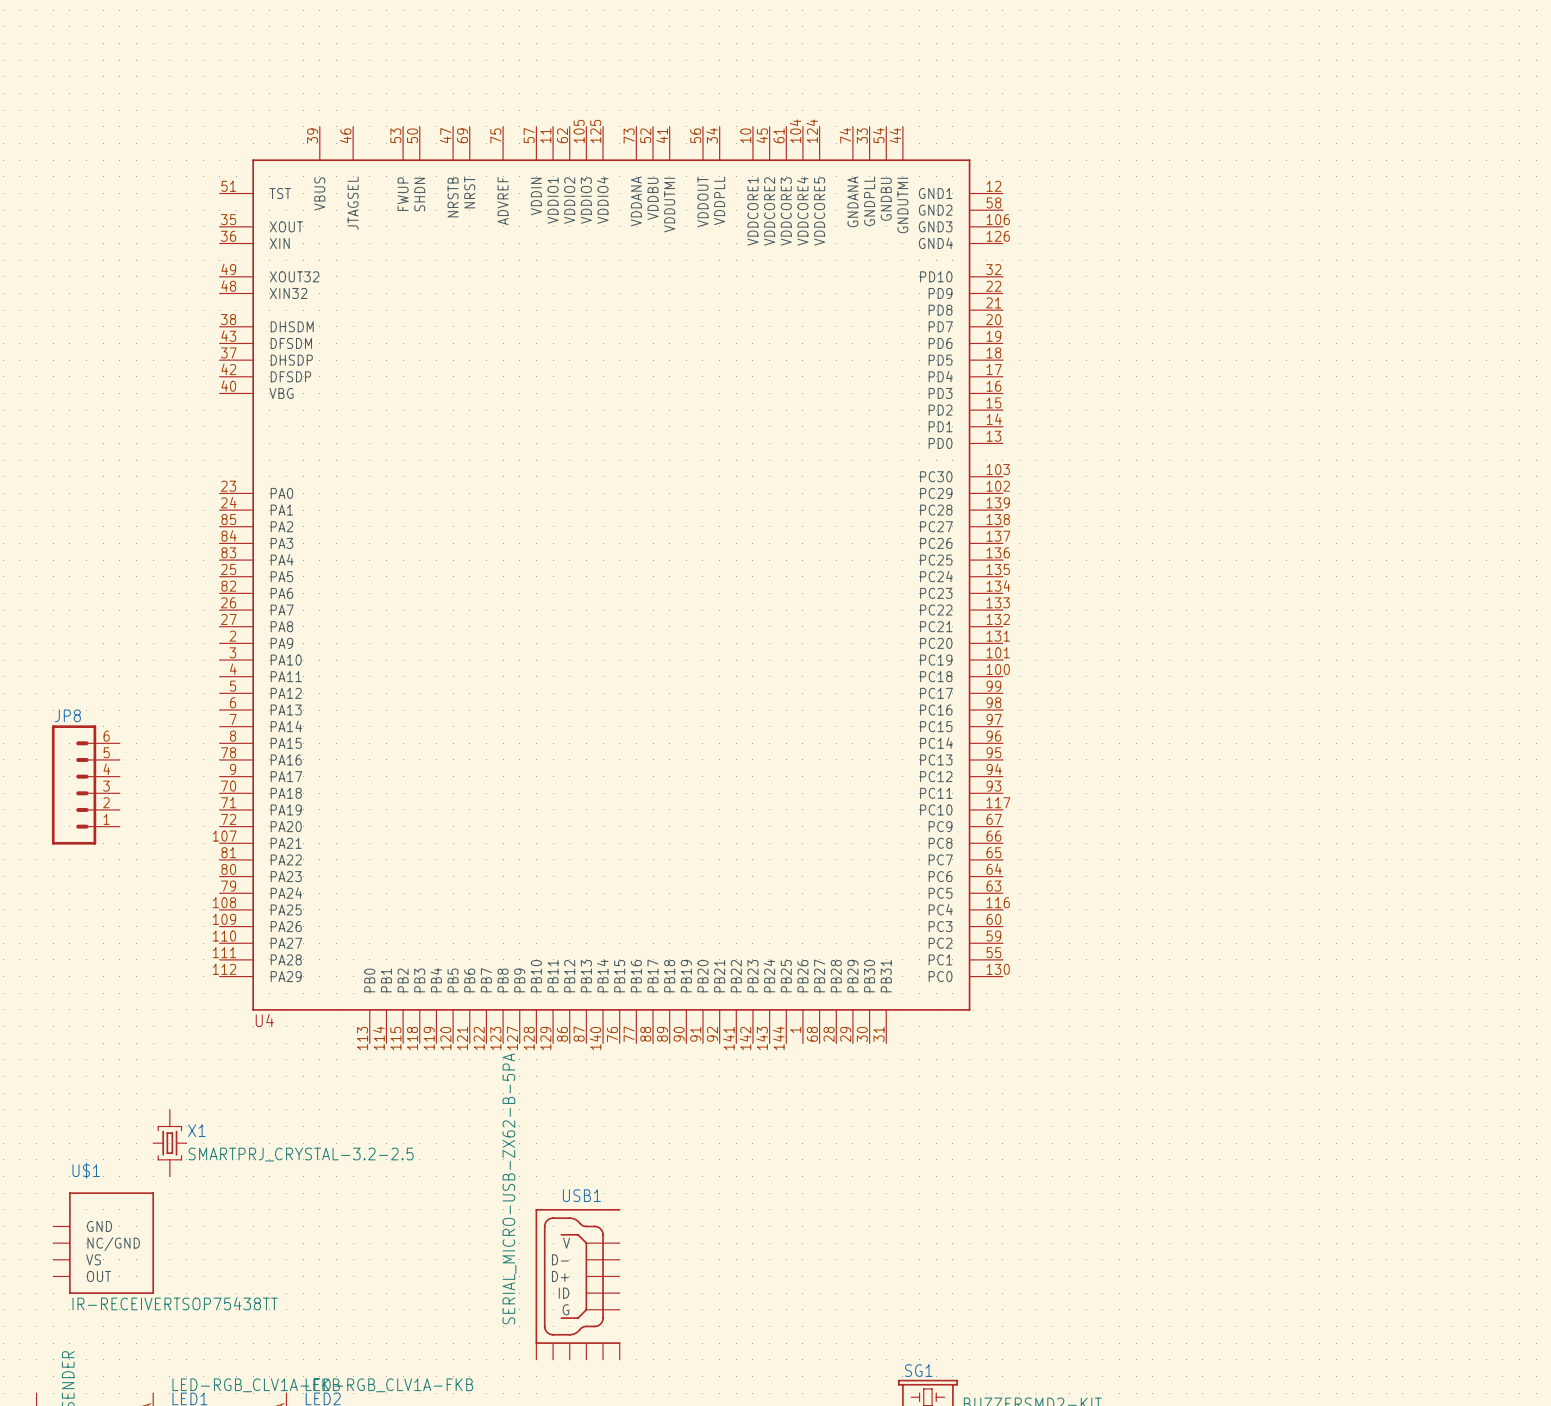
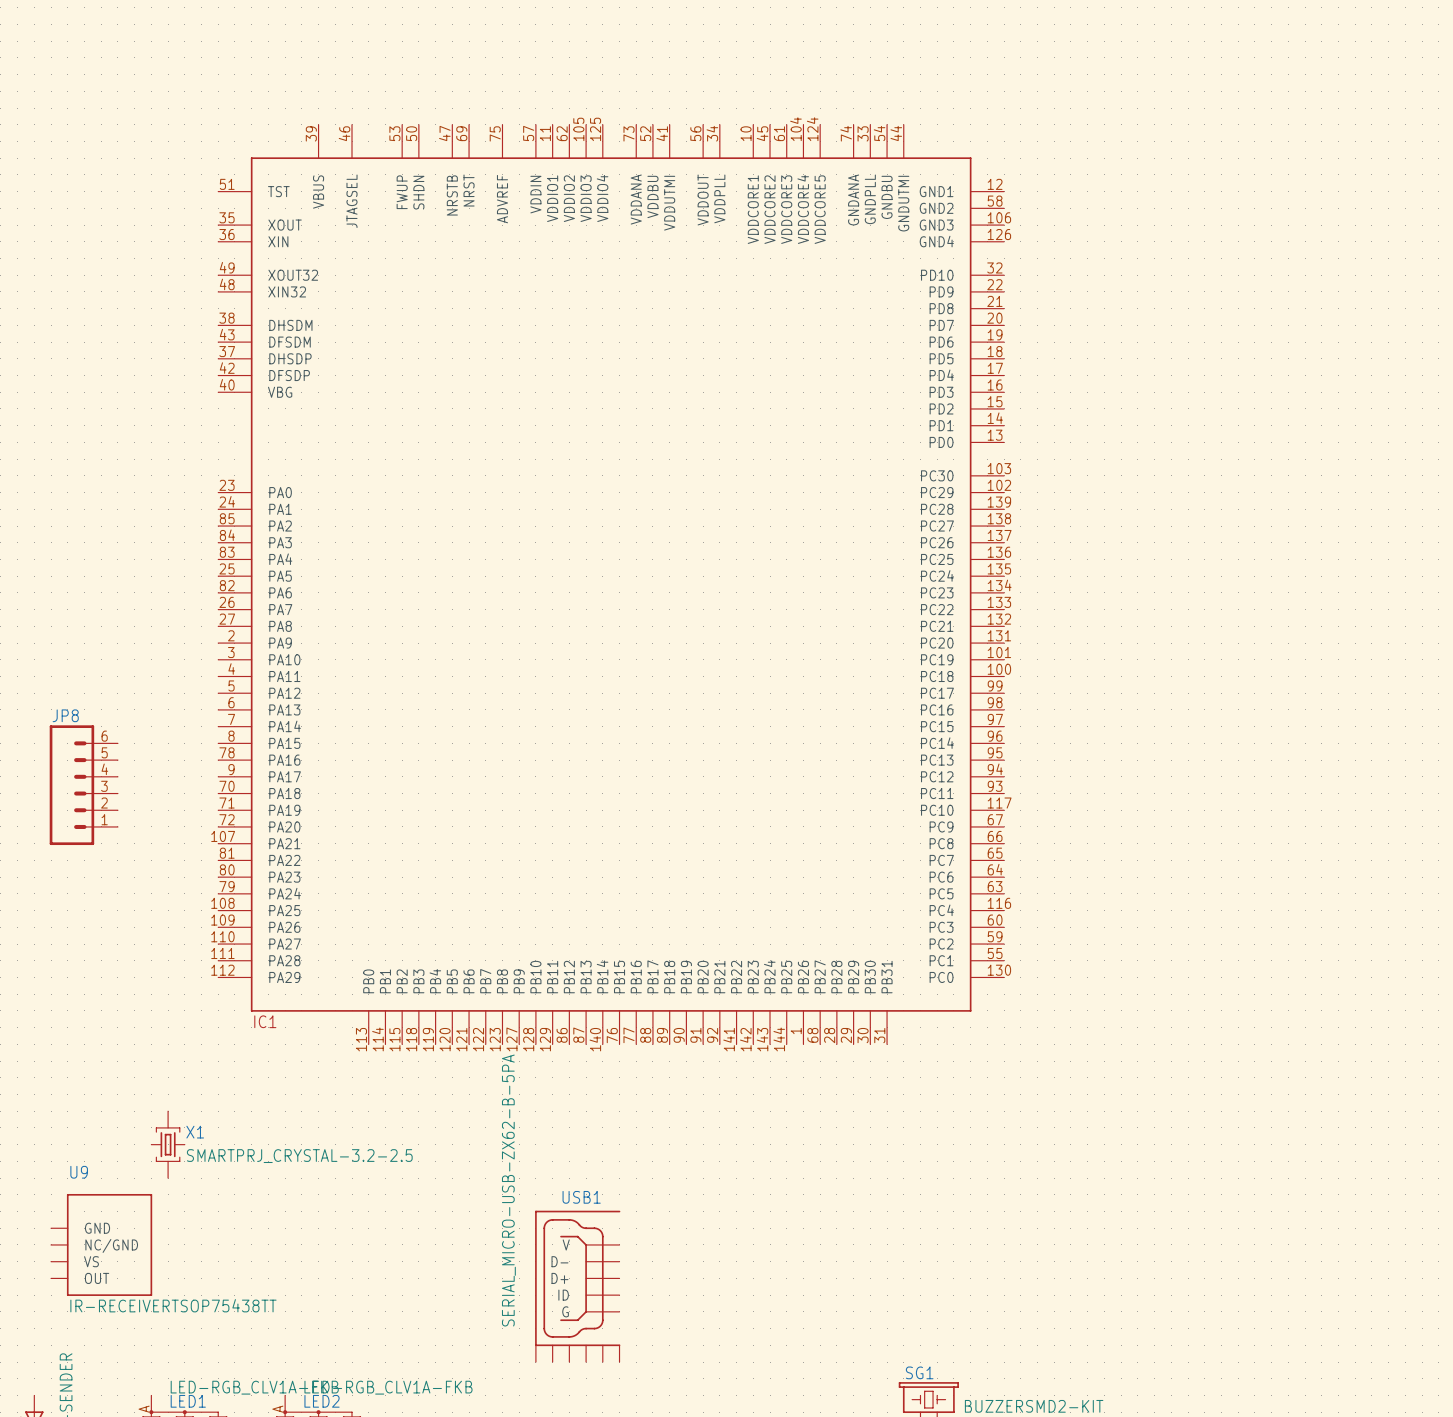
U4 name: U4 (264, 1020) -> IC1 (265, 1021)
U$1 name: U$1 (86, 1170) -> U9 (79, 1172)

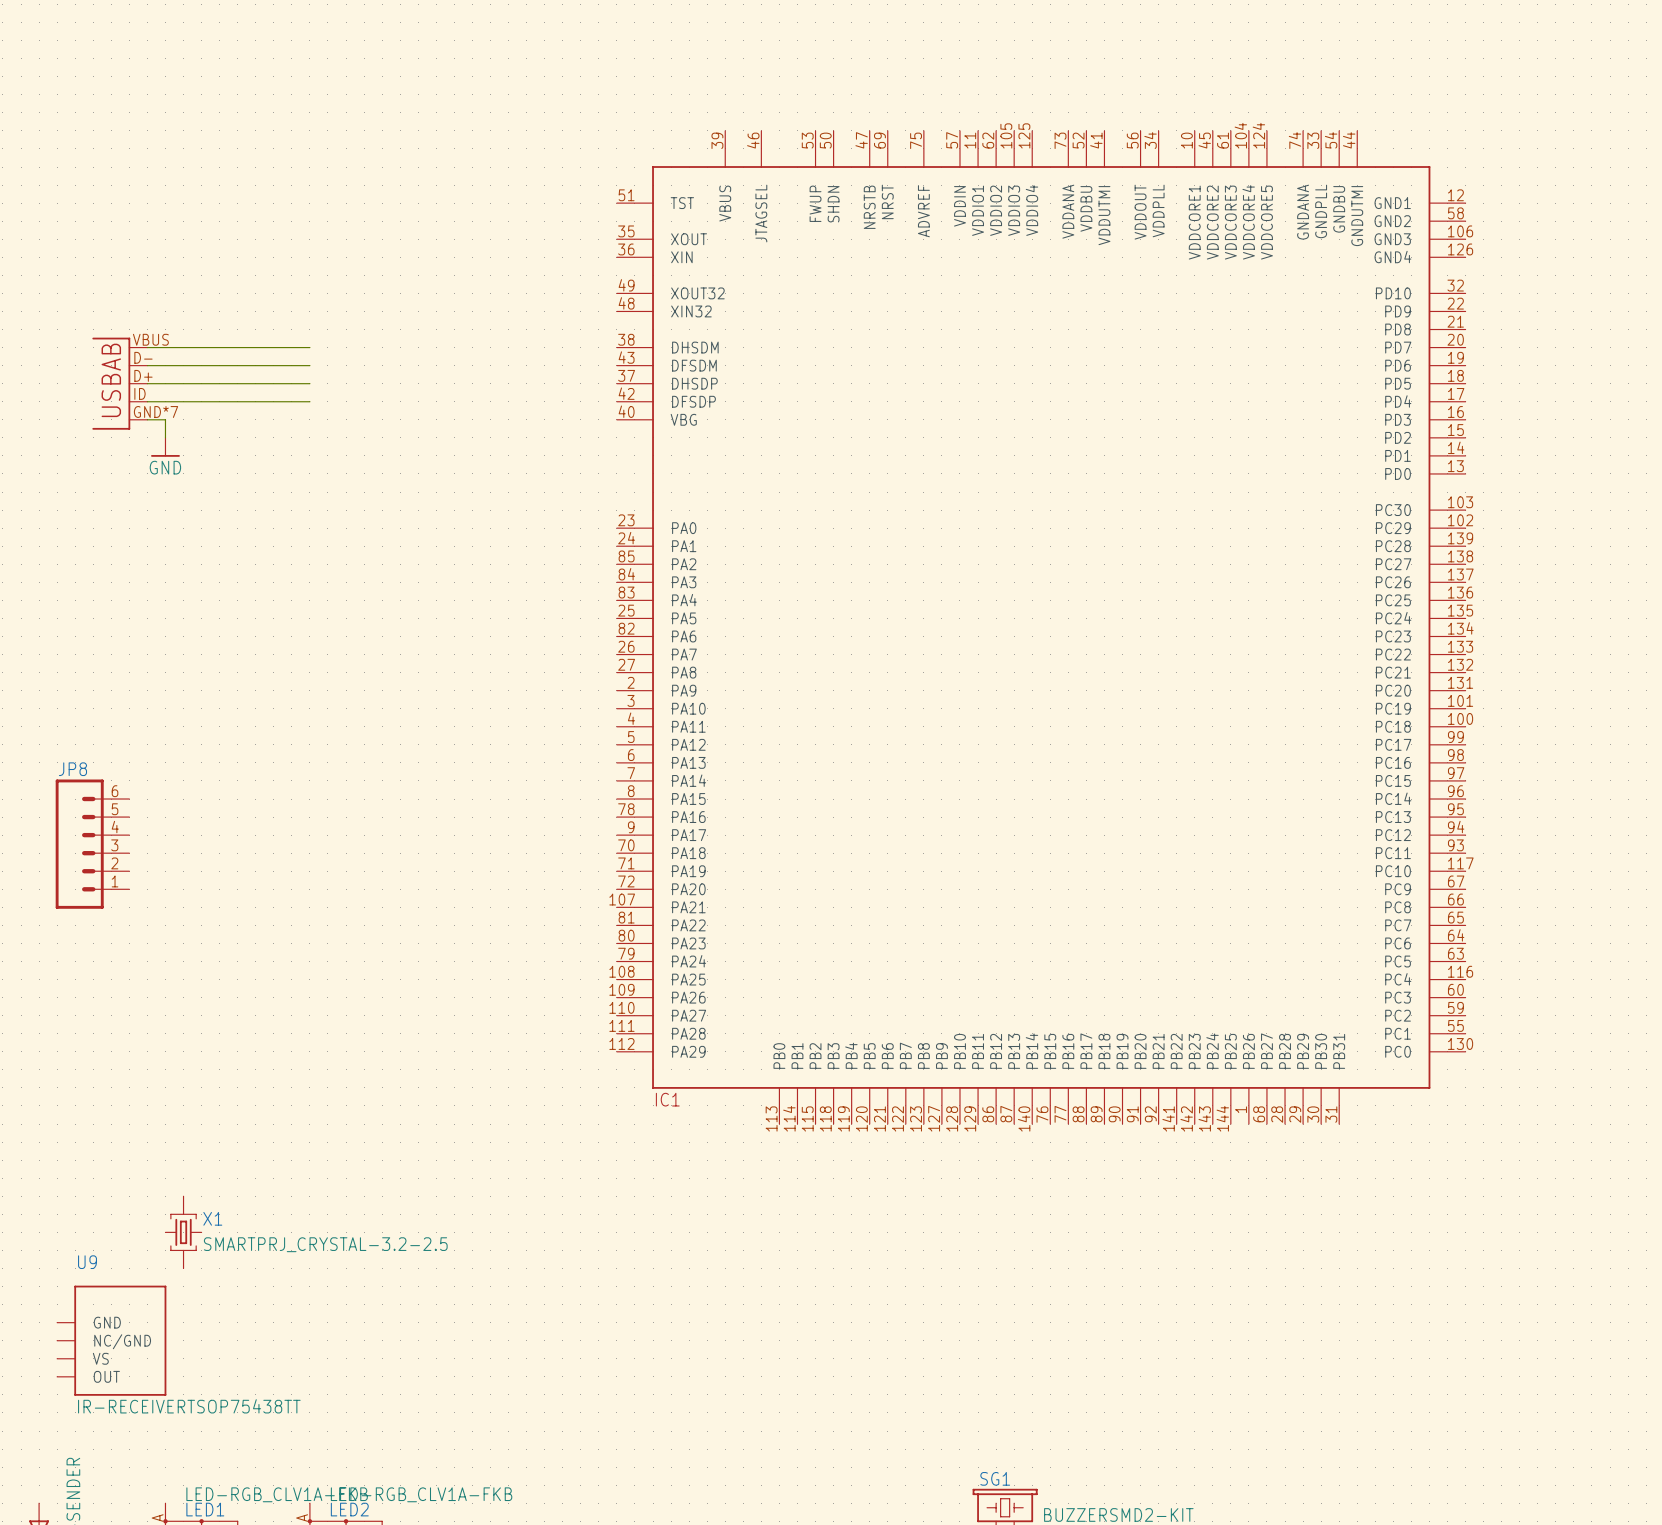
wire: none -> (147, 347) (309, 347)
wire: none -> (147, 365) (309, 365)
part: none -> (119, 383)
wire: none -> (147, 383) (309, 383)
wire: none -> (147, 401) (309, 401)
wire: none -> (147, 419) (165, 419) (165, 437)
power symbol: none -> GND (165, 447)
IC1 position: (611, 584) -> (1041, 627)
USB1: SERIAL_MICRO-USB-ZX62-B-5PA (577, 1286) -> none

